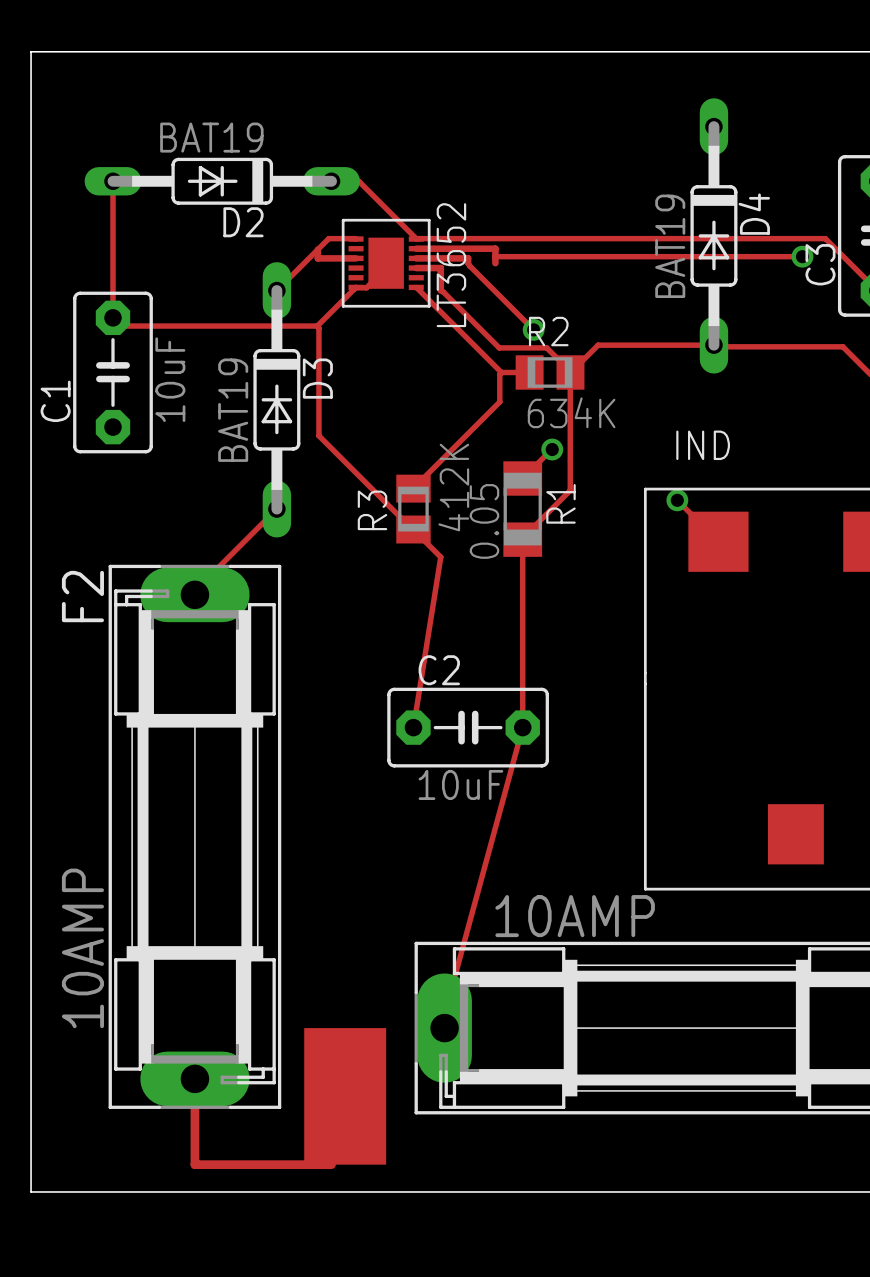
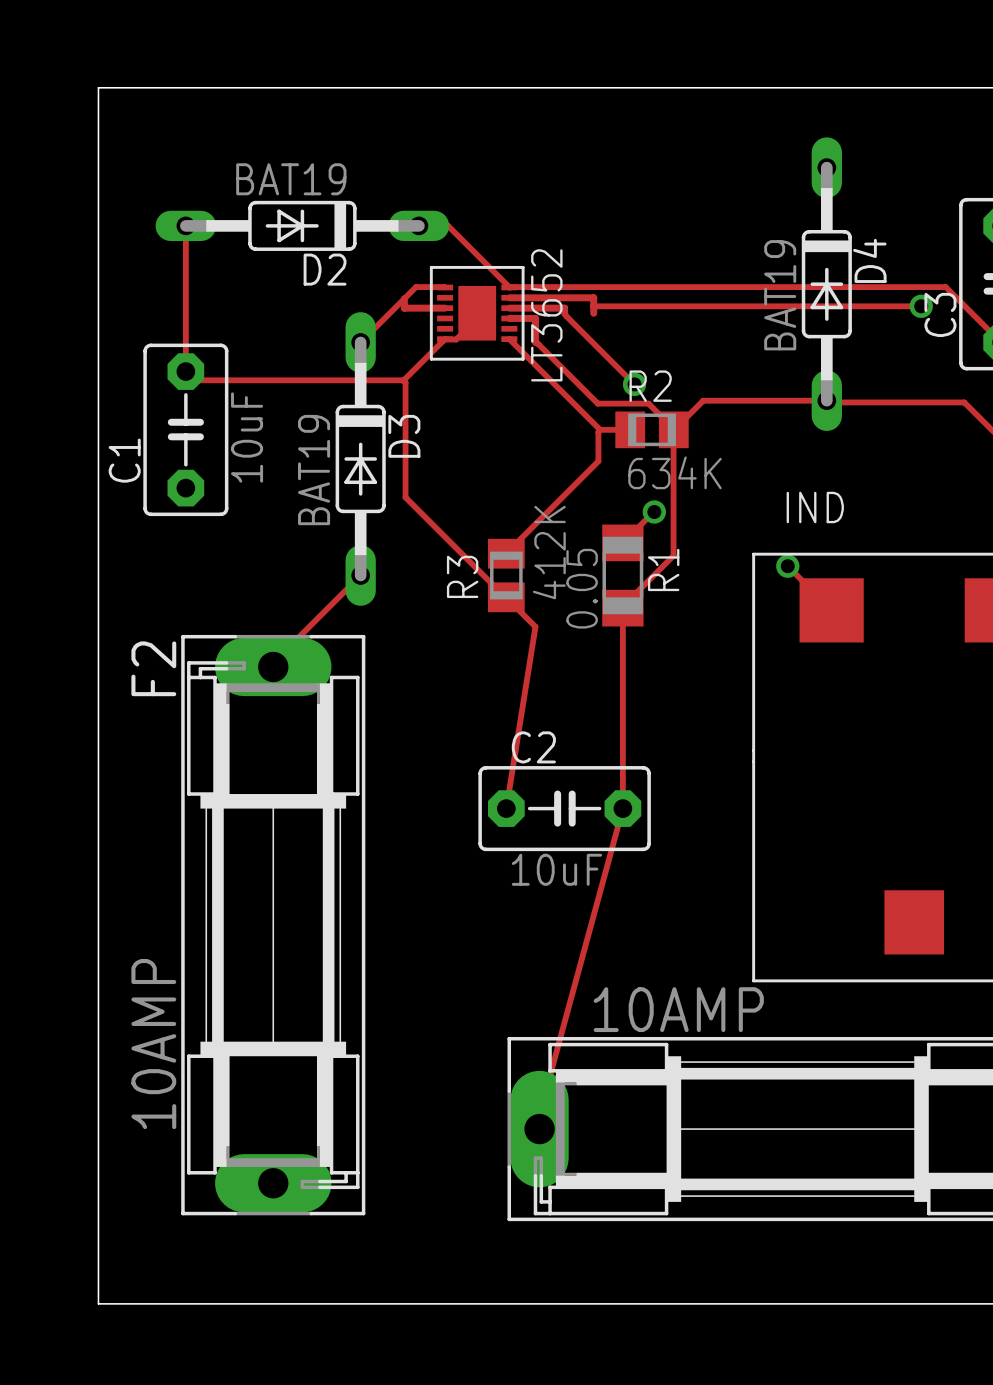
drawing: [304, 1028, 387, 1165] -> none
track: (194, 1082) (194, 1164) (331, 1164) -> none

